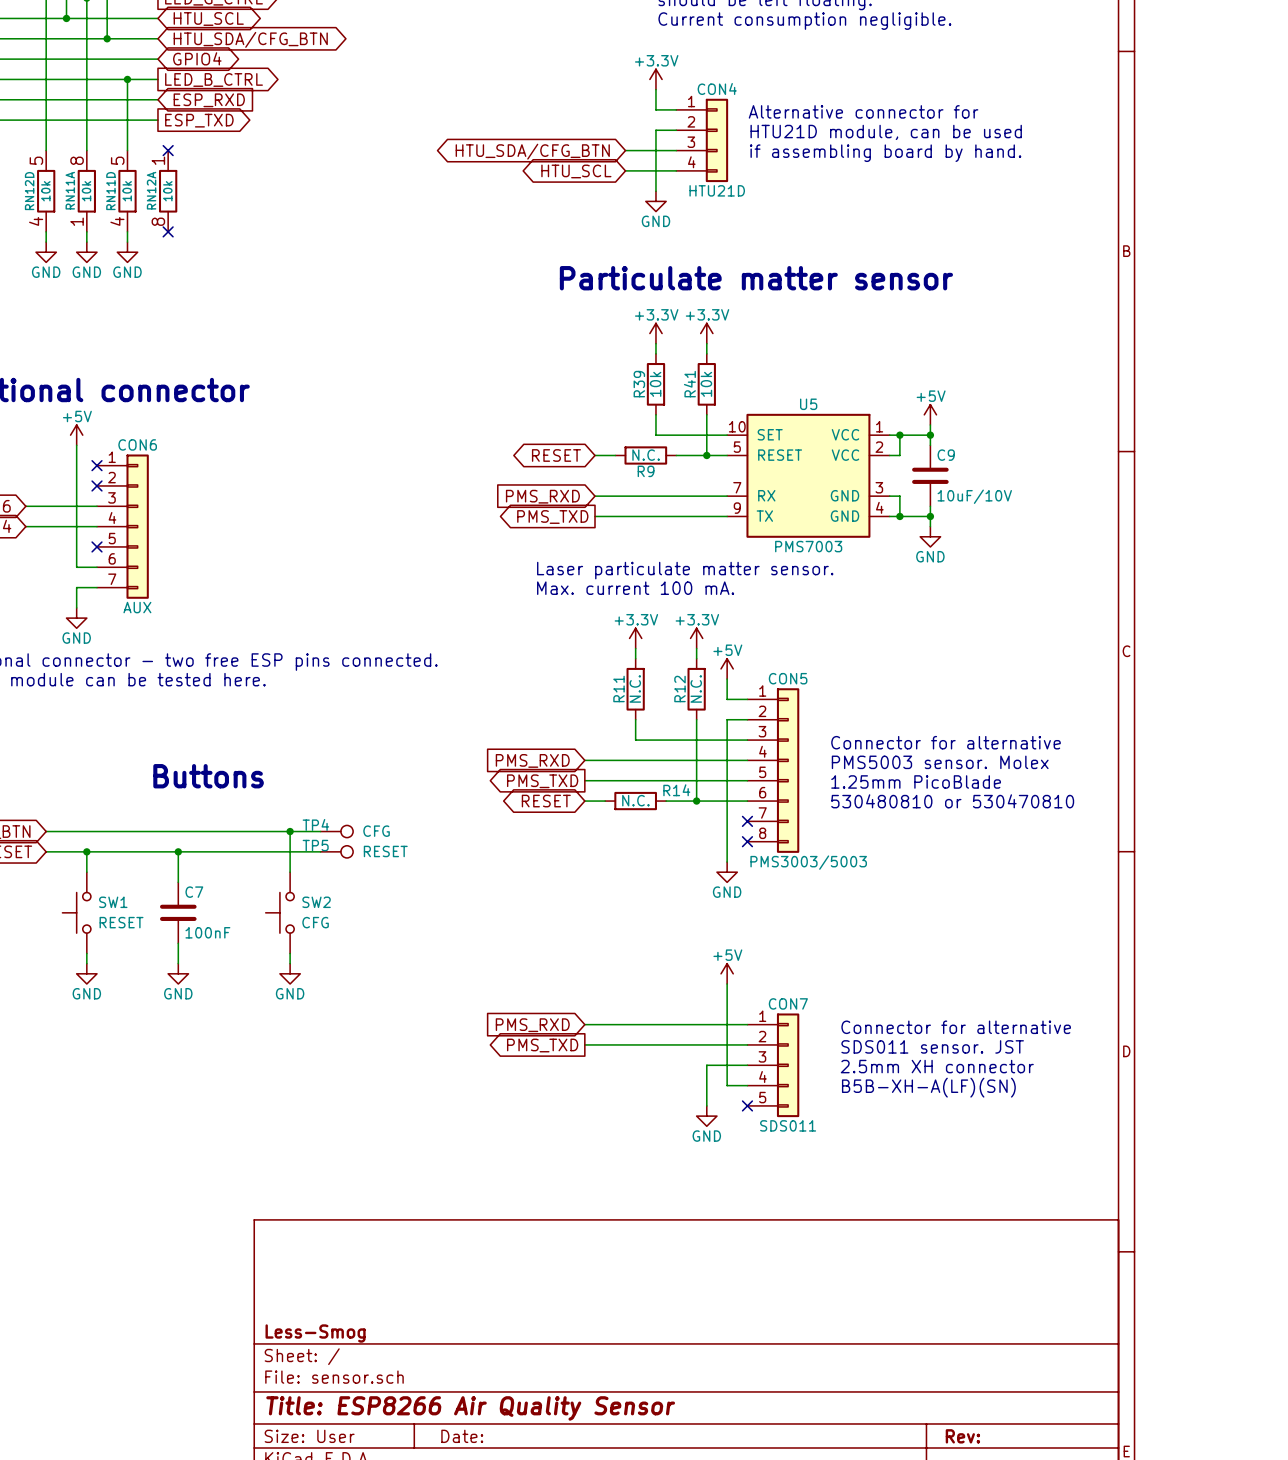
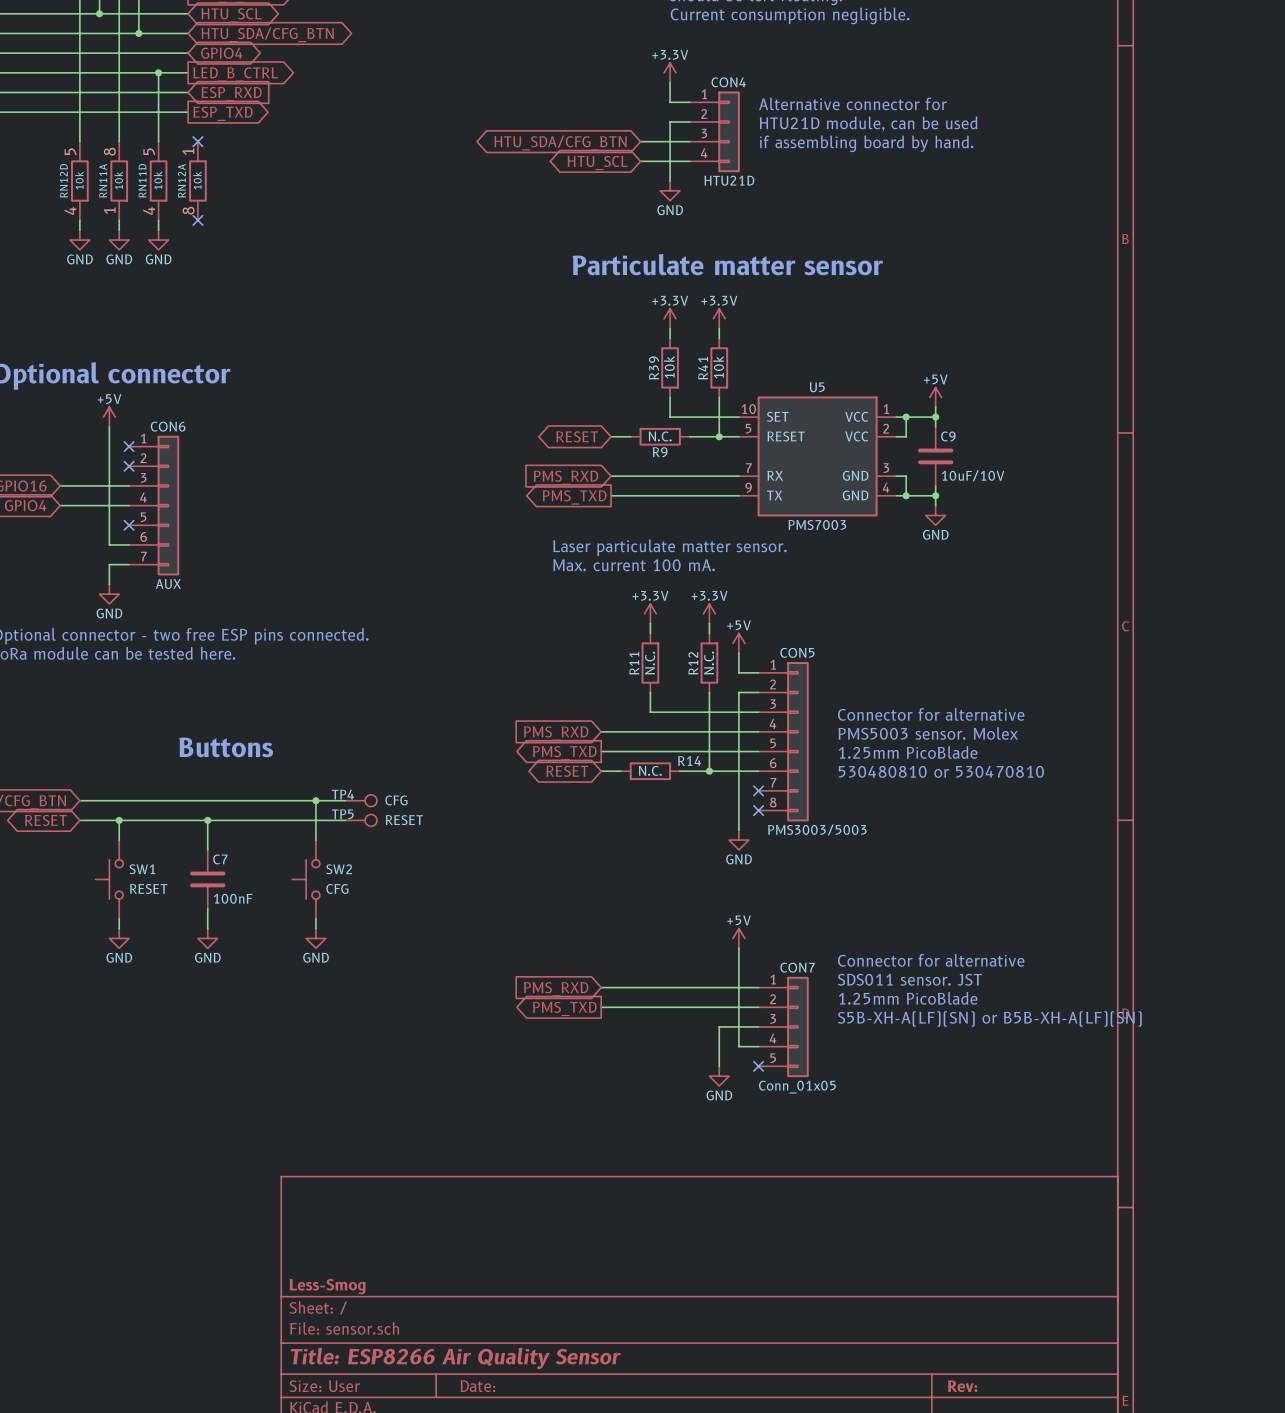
text position: Connector for alternative (956, 1027) -> Connector for alternative (931, 960)
text: none -> 1.25mm PicoBlade (908, 998)
text position: SDS011 sensor. JST (932, 1046) -> SDS011 sensor. JST (909, 979)
text: none -> S5B-XH-A(LF)(SN) or B5B-XH-A(LF)(SN) (989, 1019)
text: 2.5mm XH connector (937, 1066) -> none
text: B5B-XH-A(LF)(SN) (928, 1087) -> none
CON7 value: SDS011 (788, 1125) -> Conn_01x05 (797, 1087)

